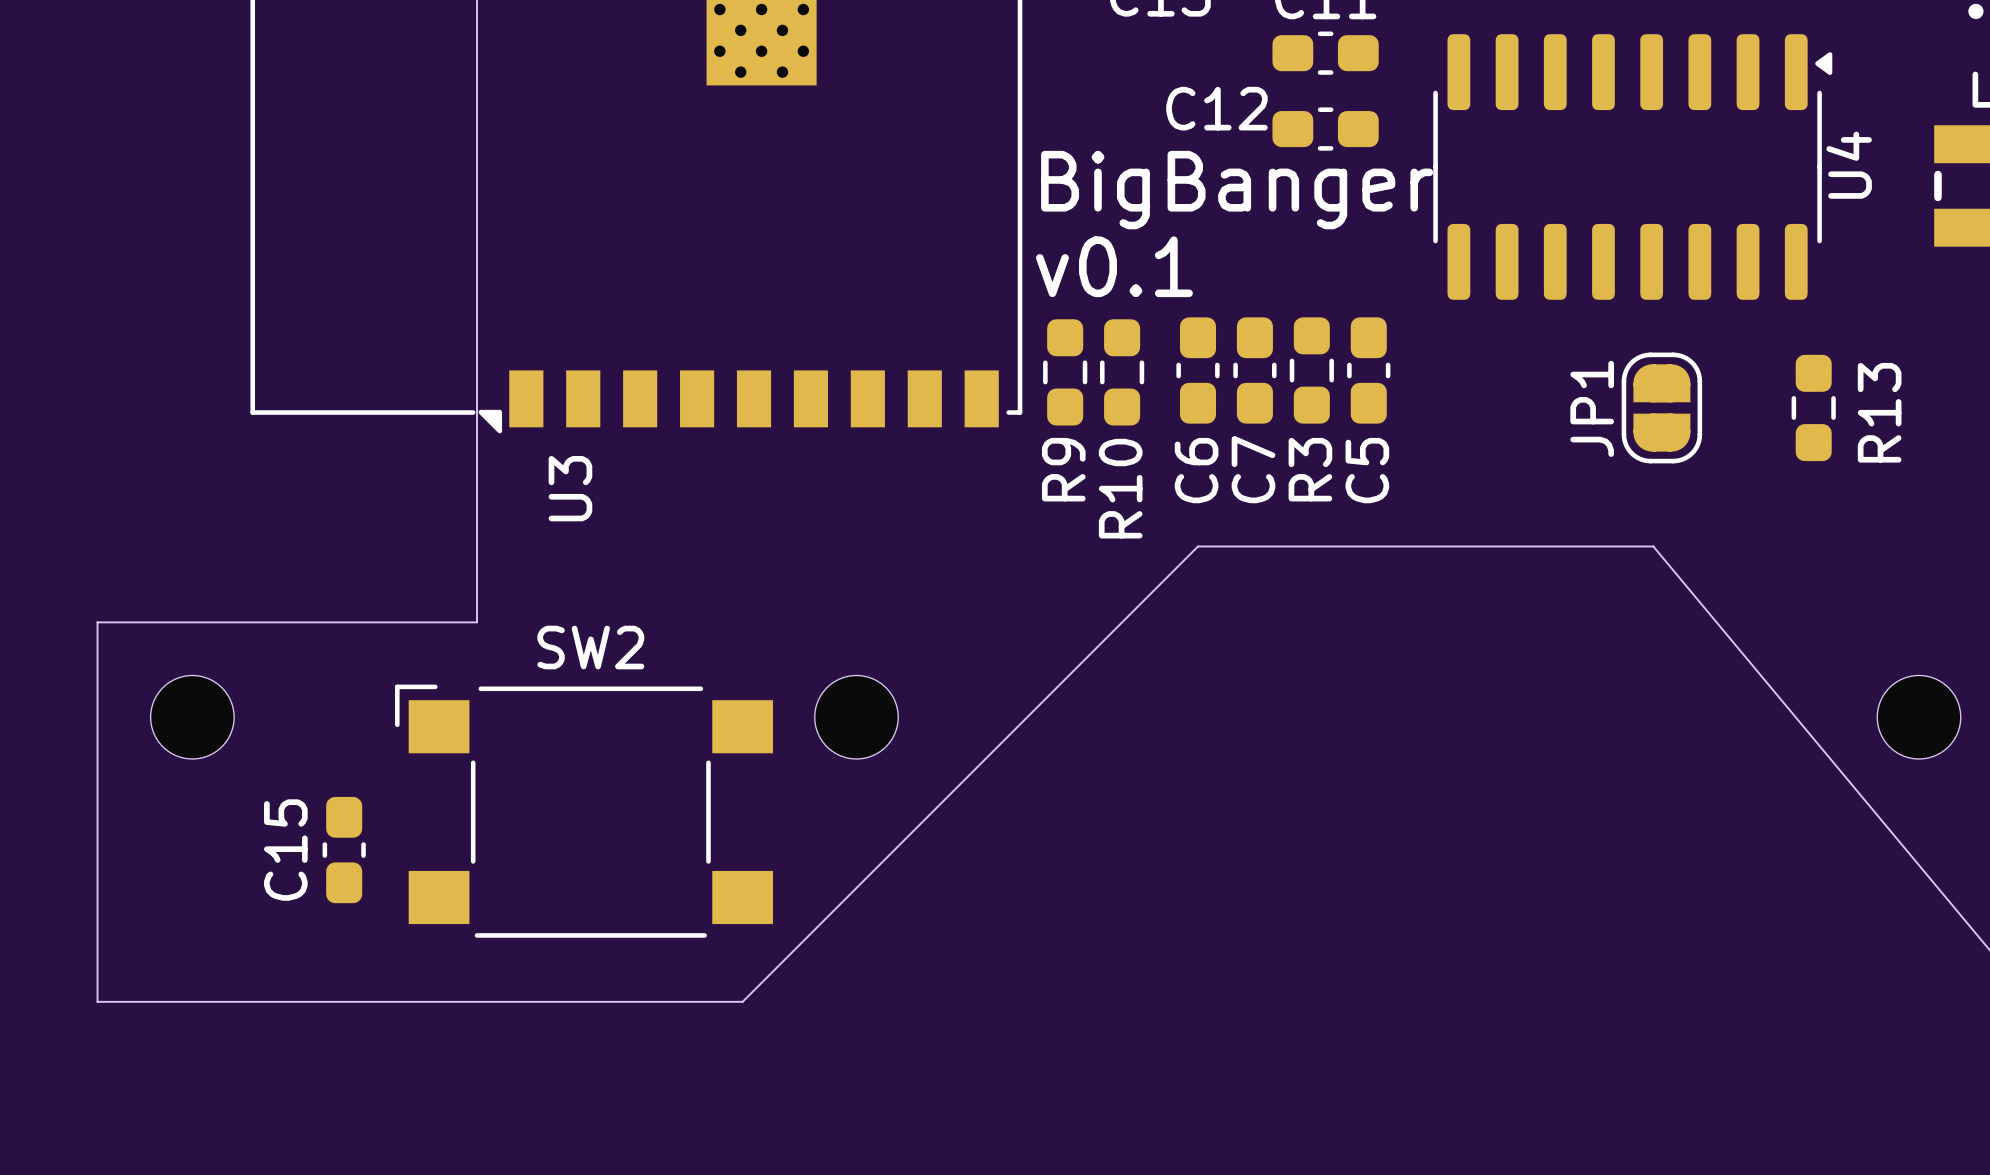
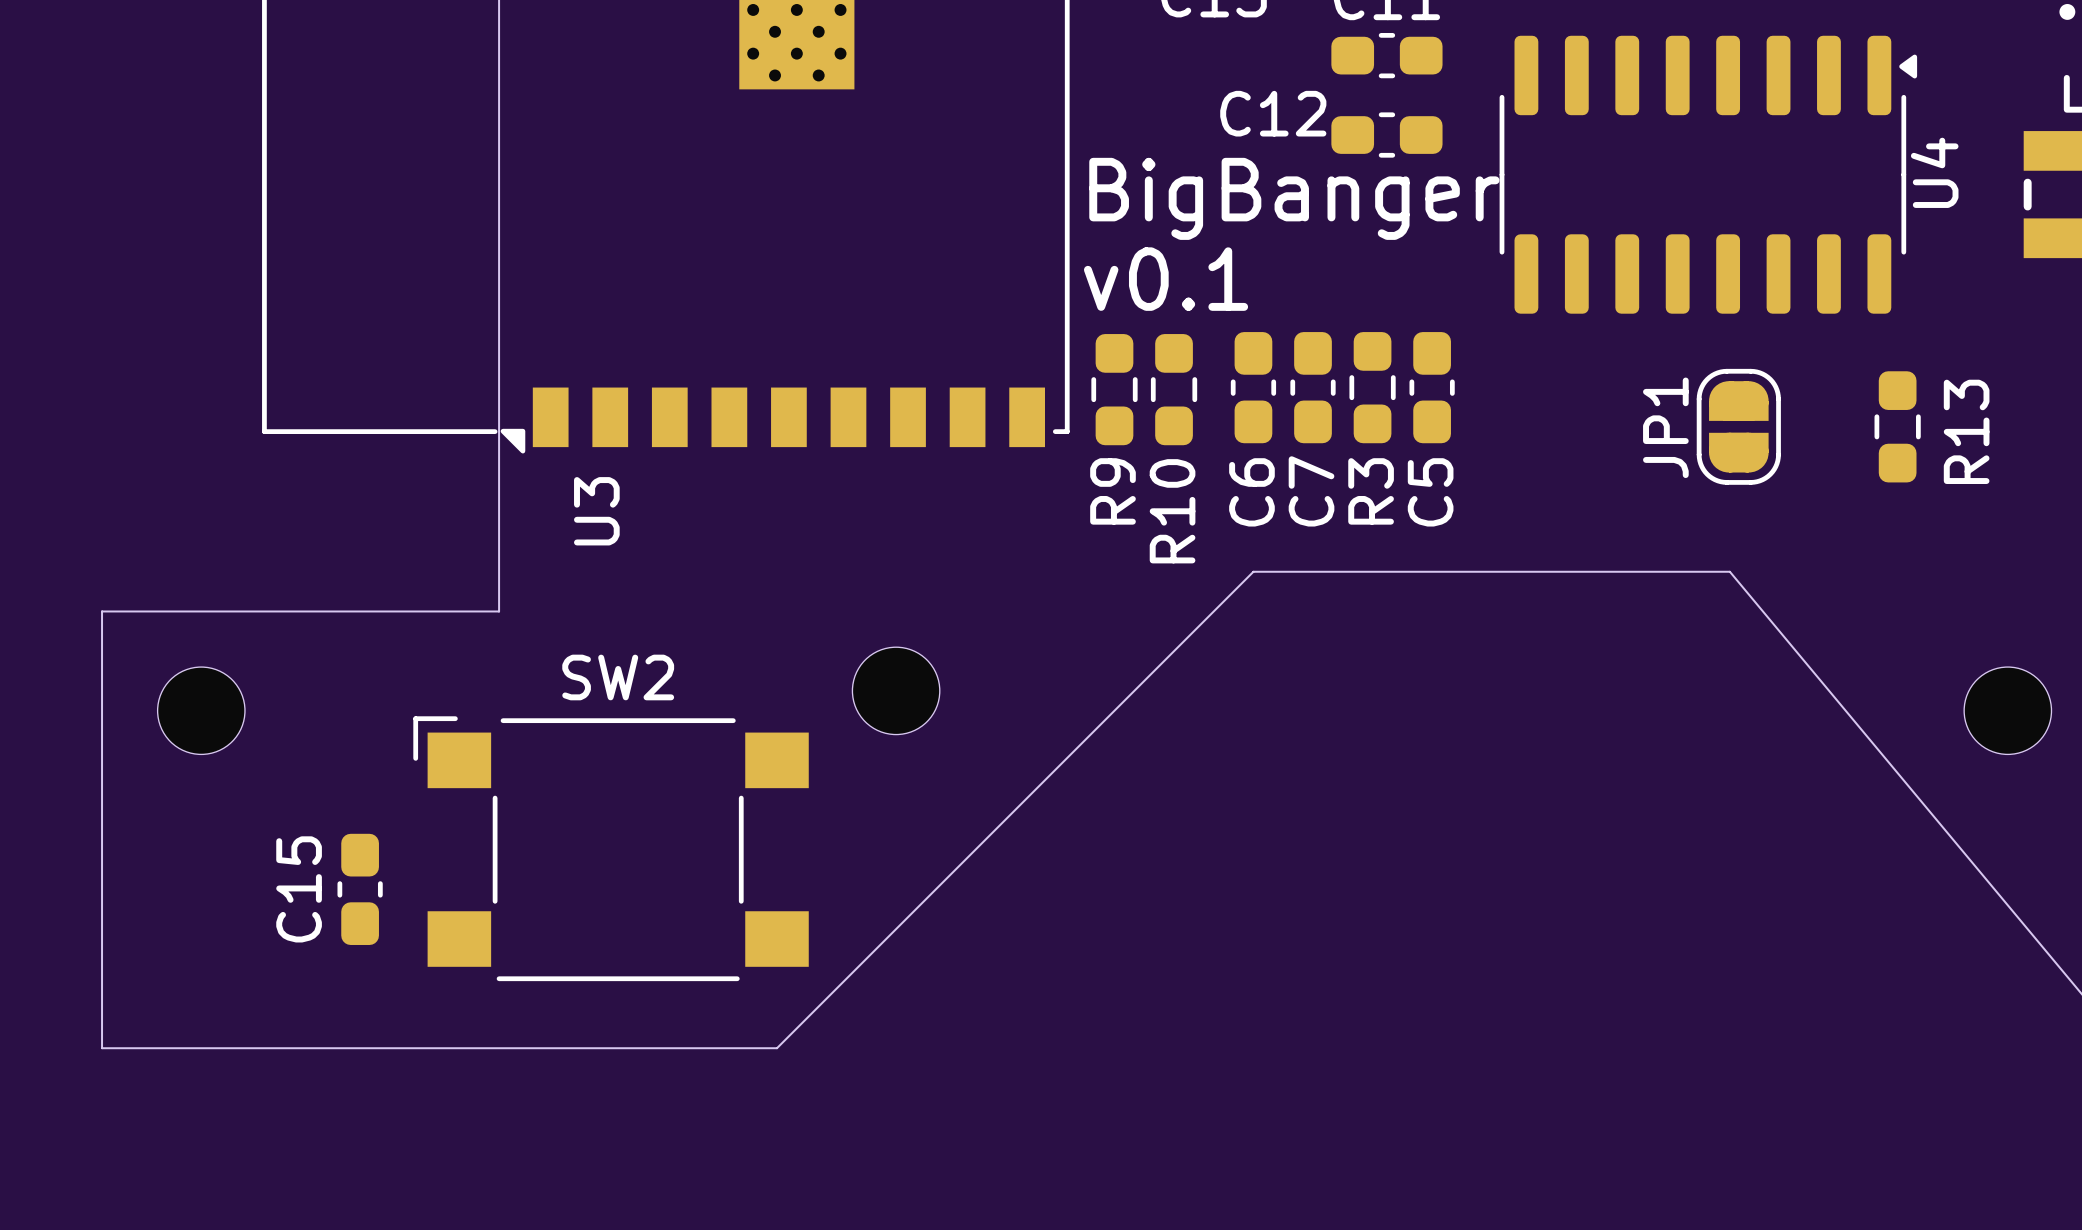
board edge: (477, 584) (477, 622) (97, 622) -> (499, 611) (102, 611) (102, 651)
part position: (192, 717) -> (201, 710)
part position: (856, 717) -> (896, 690)
part position: (1919, 717) -> (2007, 710)

